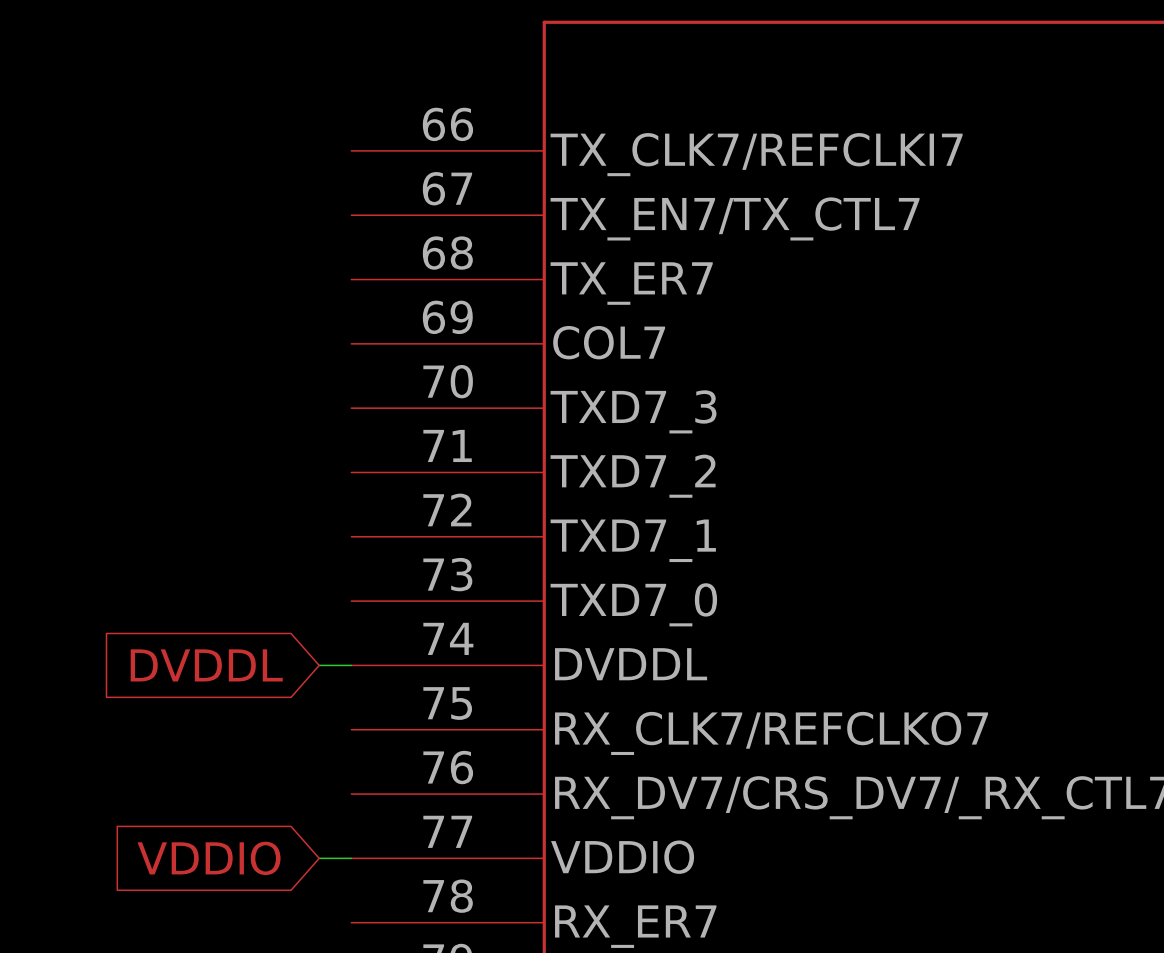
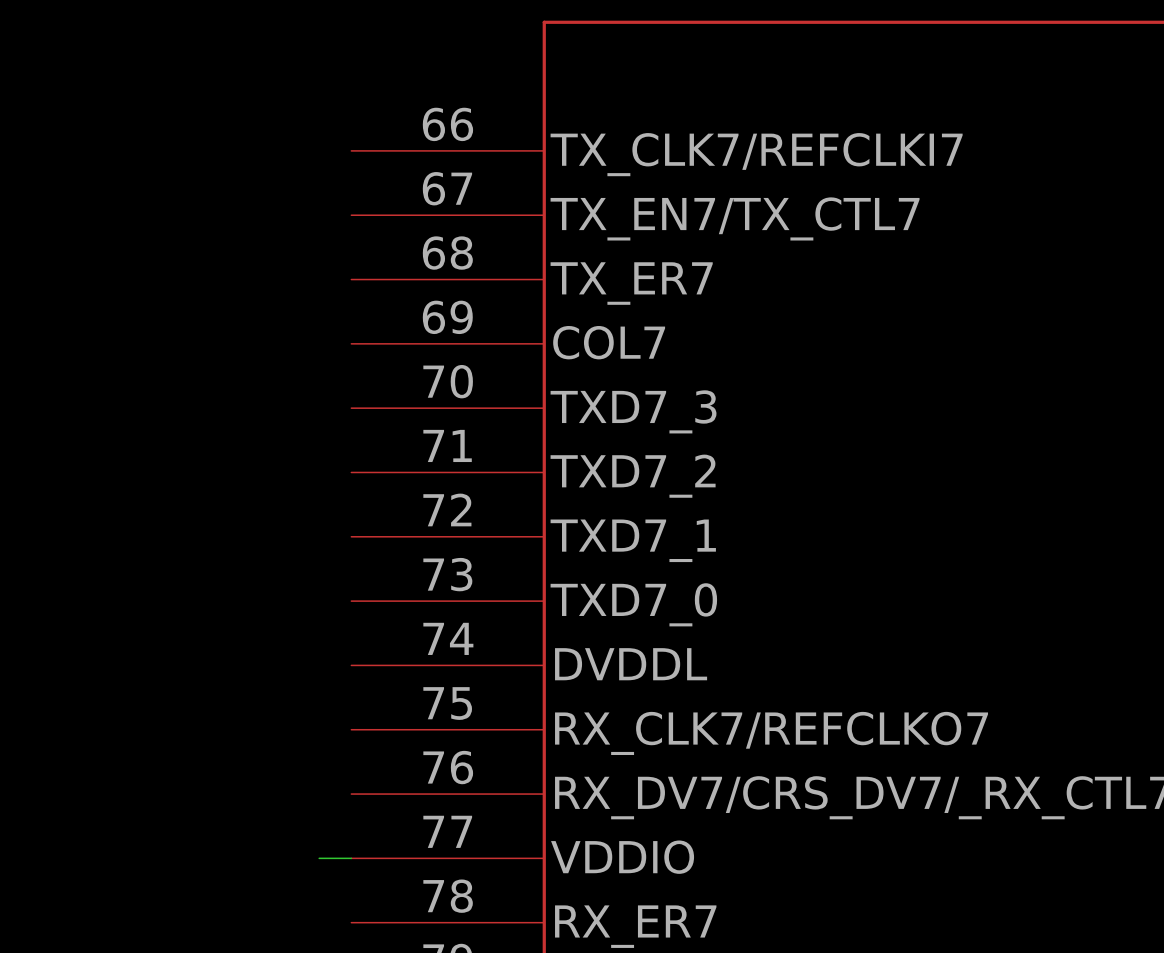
global label: DVDDL (206, 665) -> none
wire: (319, 665) (351, 665) -> none
global label: VDDIO (209, 858) -> none

